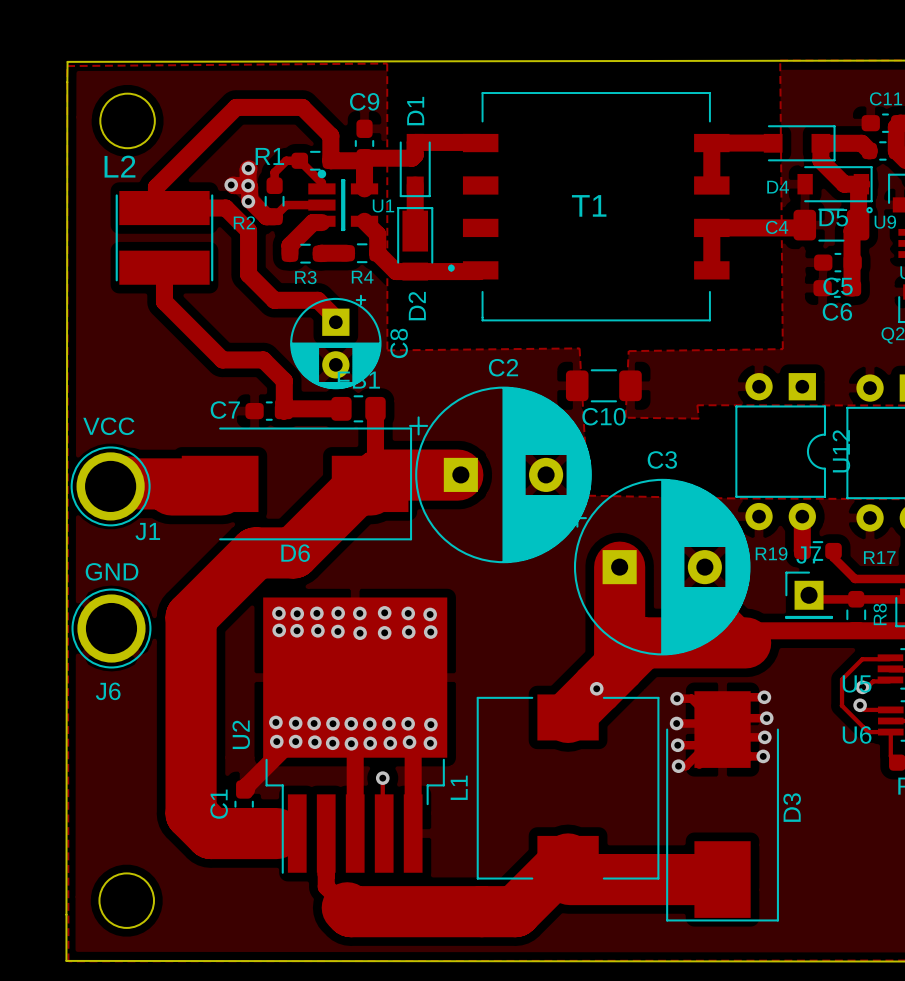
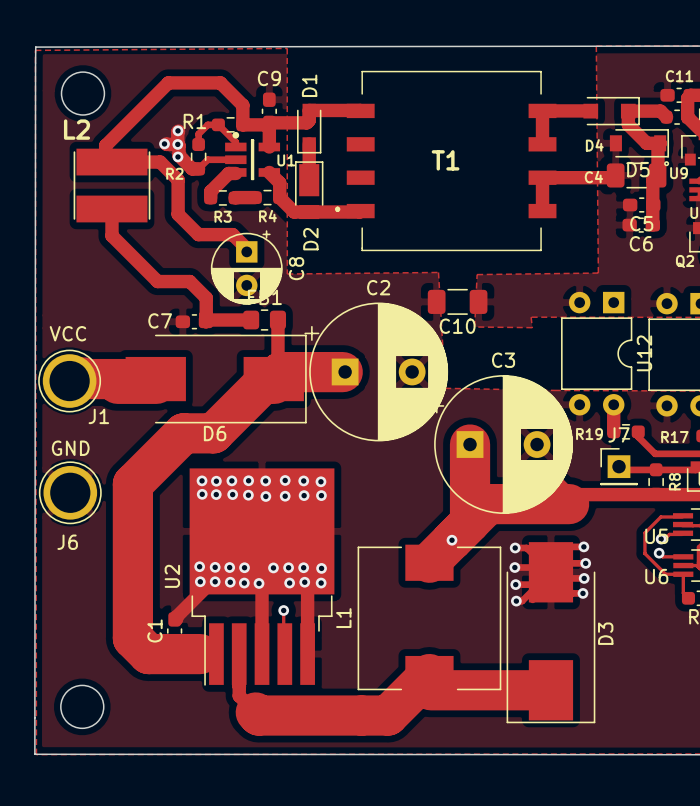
via: (351, 723) -> none
via: (370, 743) -> none

